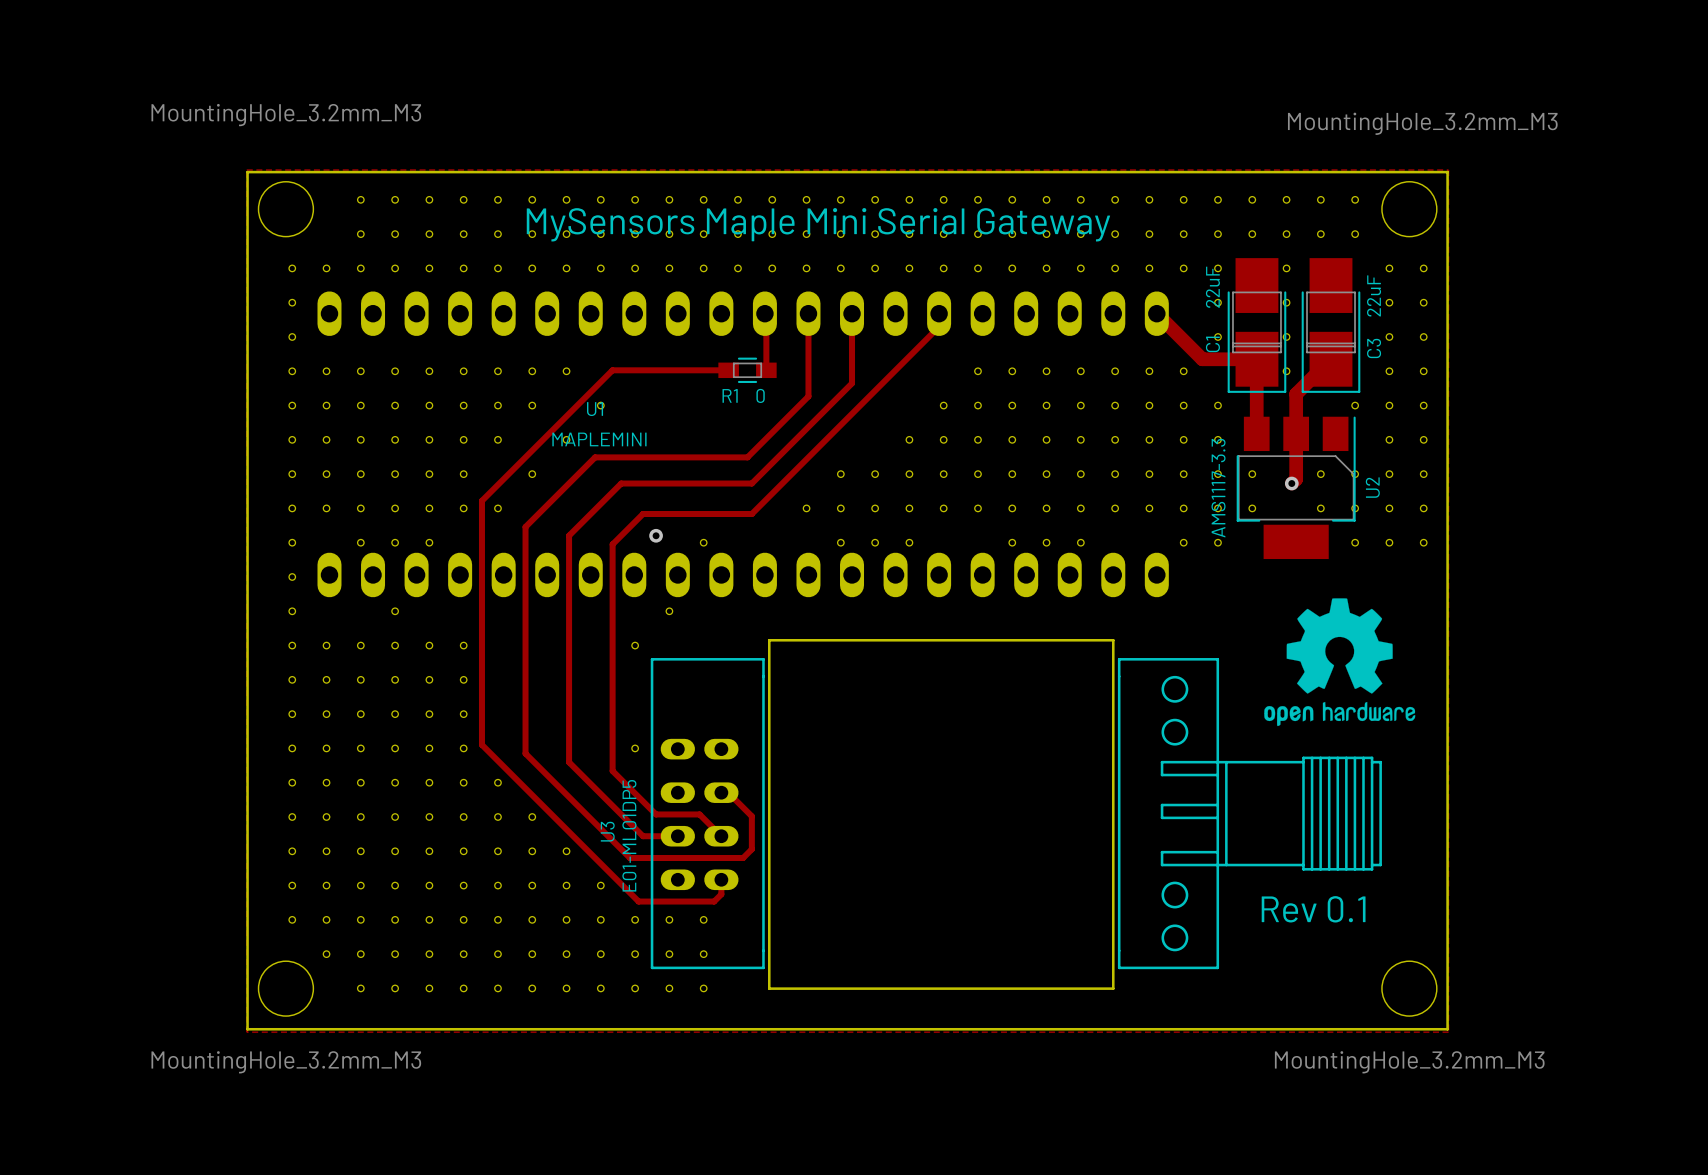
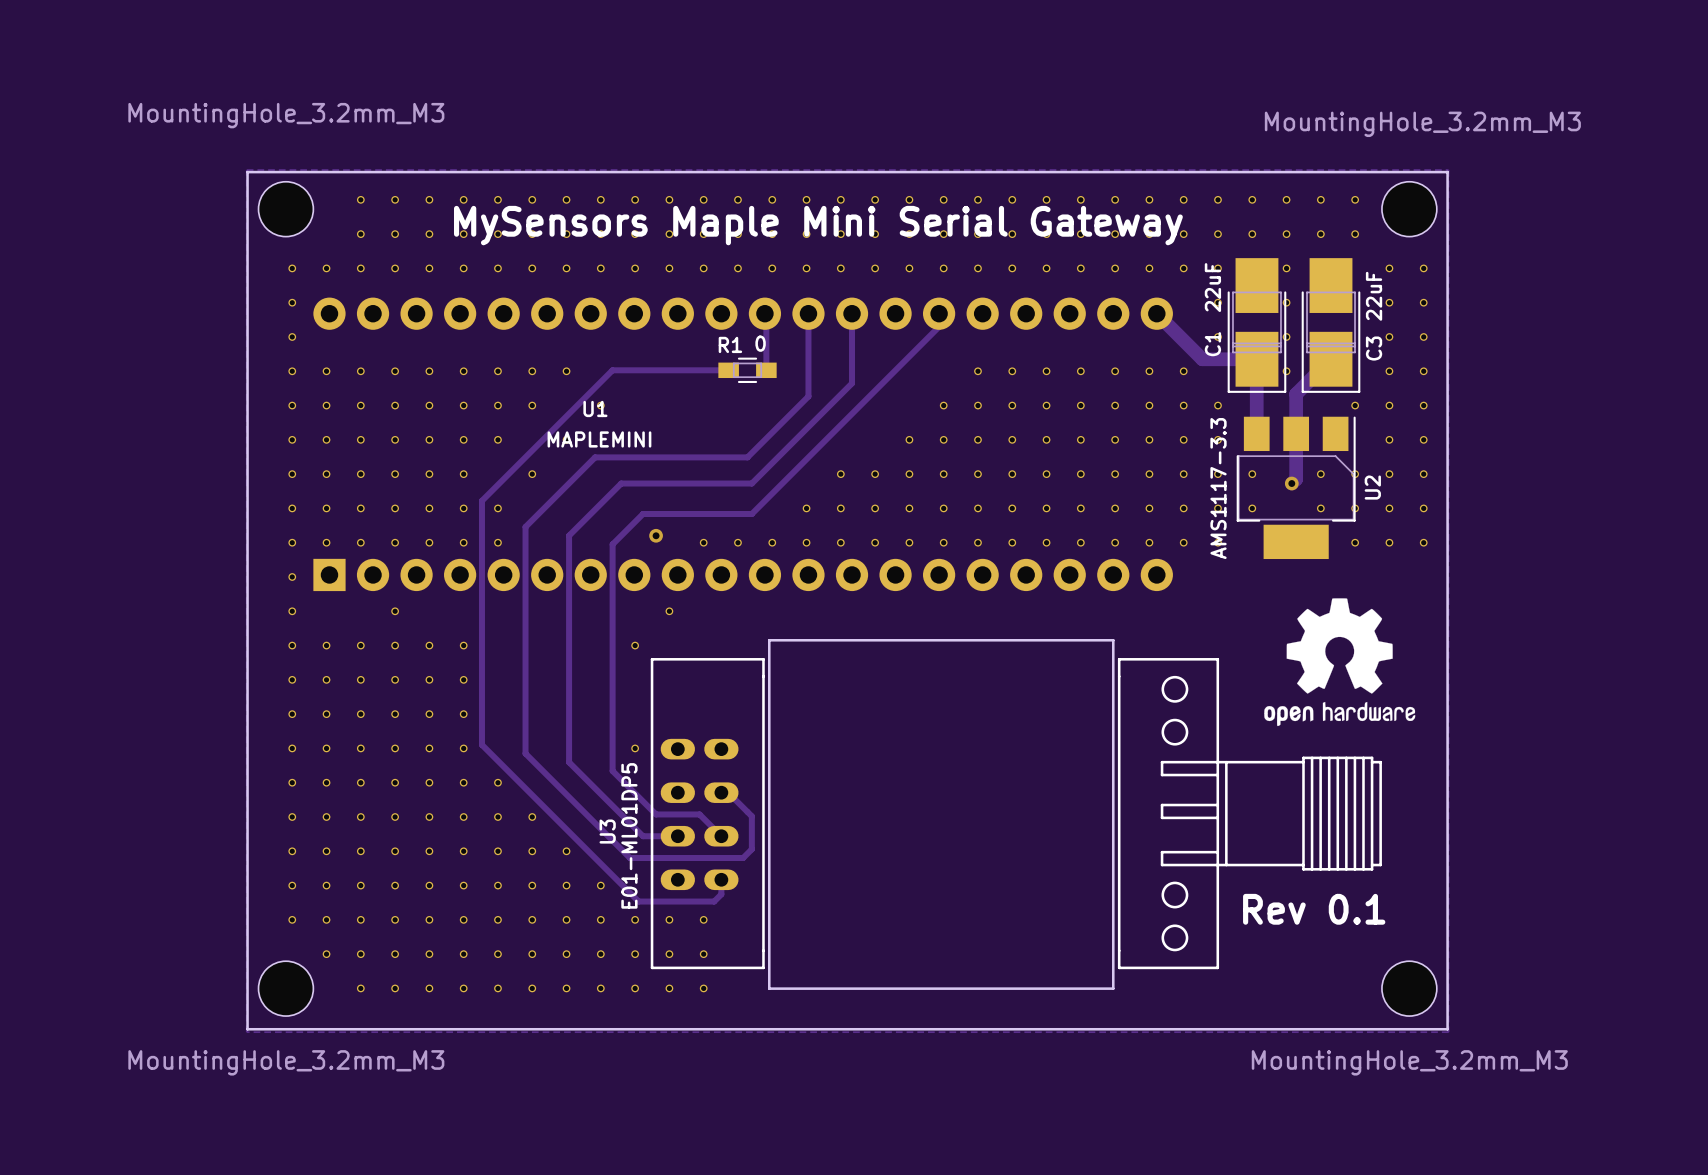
U1 footprint: [317, 291, 1169, 598] -> [313, 297, 1173, 592]
R1 name position: R1 (730, 395) -> R1 (730, 344)
R1 value position: 0 (760, 395) -> 0 (760, 343)
part: none -> (326, 542)
part: none -> (463, 542)
part: none -> (497, 542)
part: none -> (737, 542)
part: none -> (772, 542)
part: none -> (806, 542)
part: none -> (943, 542)
part: none -> (977, 542)
part: none -> (1115, 542)
part: none -> (1149, 542)

